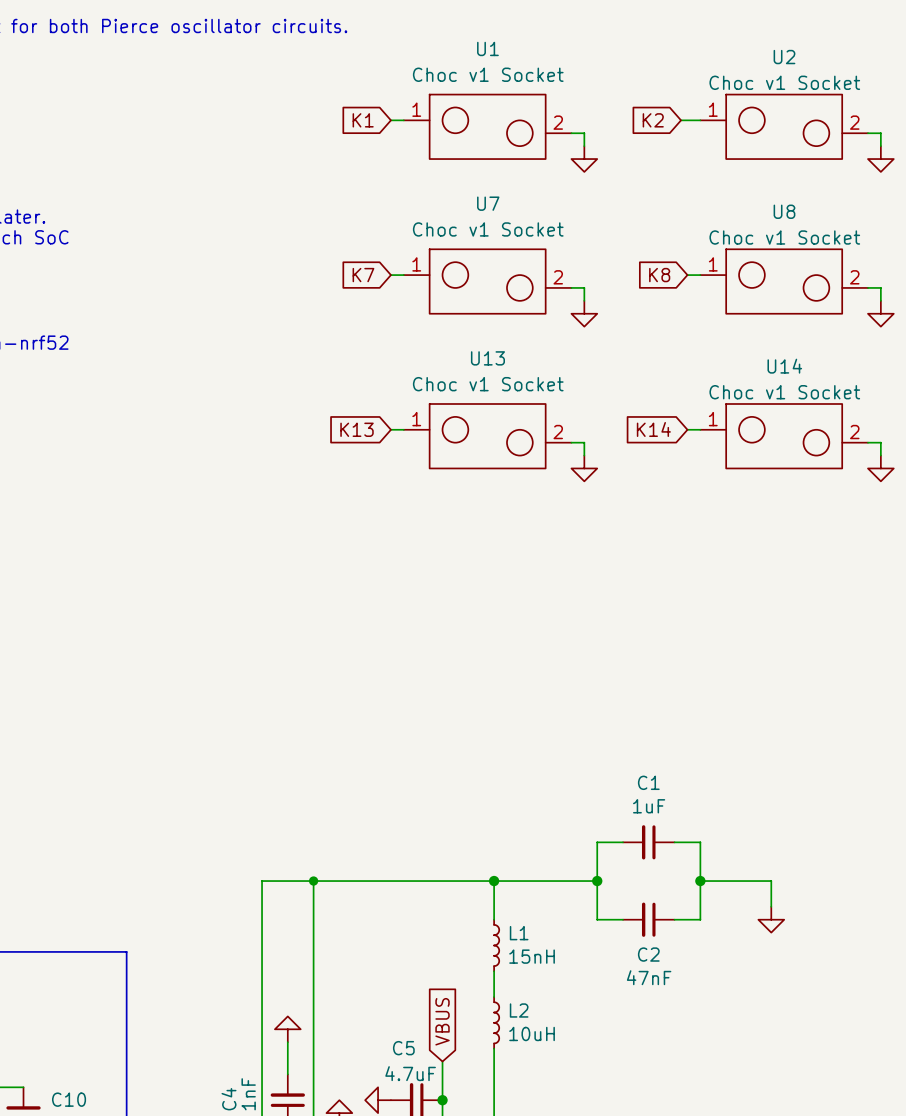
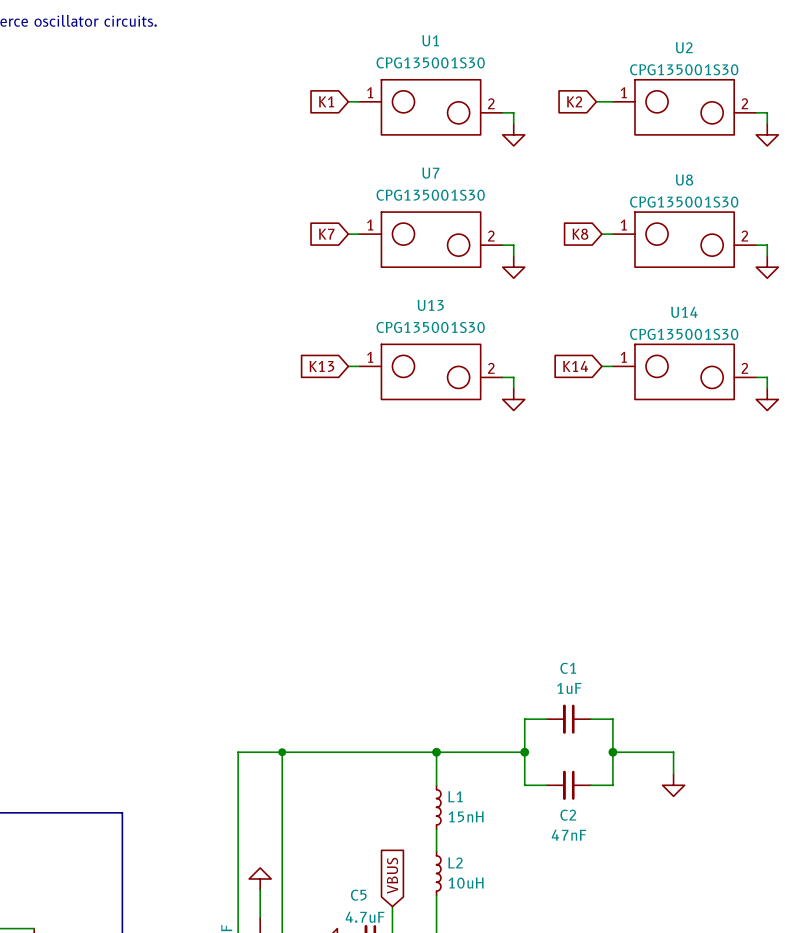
U1 value: Choc v1 Socket (488, 74) -> CPG135001S30 (430, 62)
U2 value: Choc v1 Socket (784, 82) -> CPG135001S30 (684, 69)
U7 value: Choc v1 Socket (488, 229) -> CPG135001S30 (430, 195)
U8 value: Choc v1 Socket (784, 237) -> CPG135001S30 (684, 202)
U13 value: Choc v1 Socket (488, 384) -> CPG135001S30 (430, 327)
U14 value: Choc v1 Socket (784, 392) -> CPG135001S30 (684, 334)

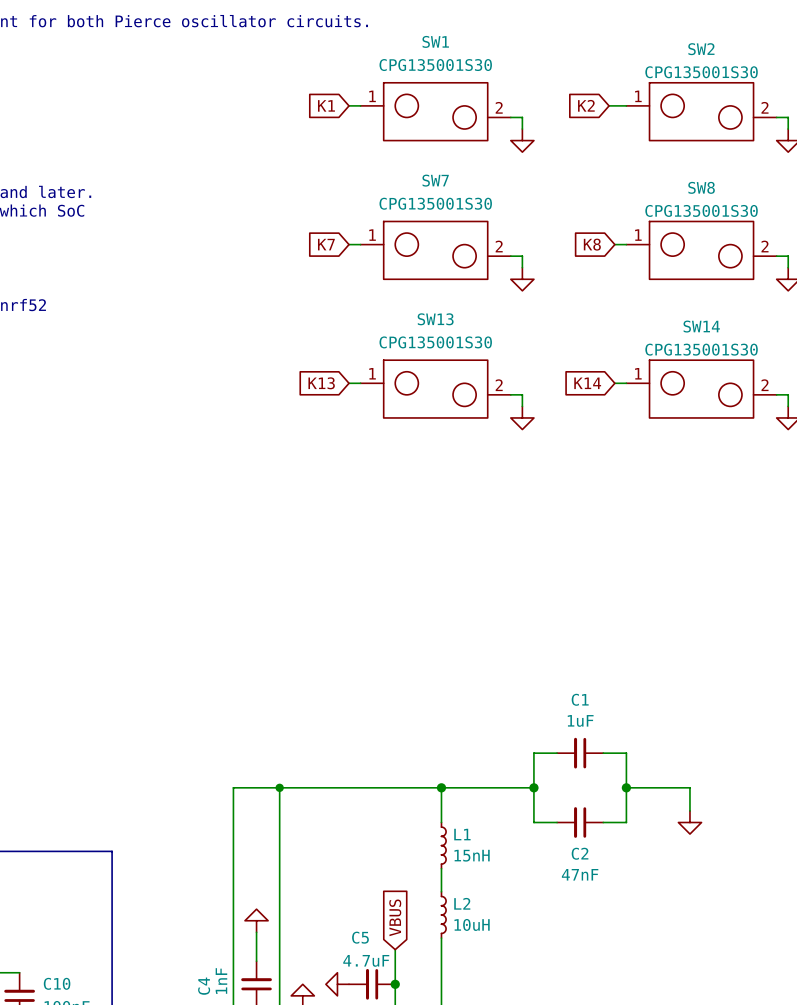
U1 name: U1 (430, 40) -> SW1 (435, 41)
U2 name: U2 (684, 47) -> SW2 (701, 49)
U7 name: U7 (430, 173) -> SW7 (435, 180)
U8 name: U8 (684, 180) -> SW8 (701, 187)
U13 name: U13 (430, 305) -> SW13 (435, 319)
U14 name: U14 (684, 312) -> SW14 (701, 326)

